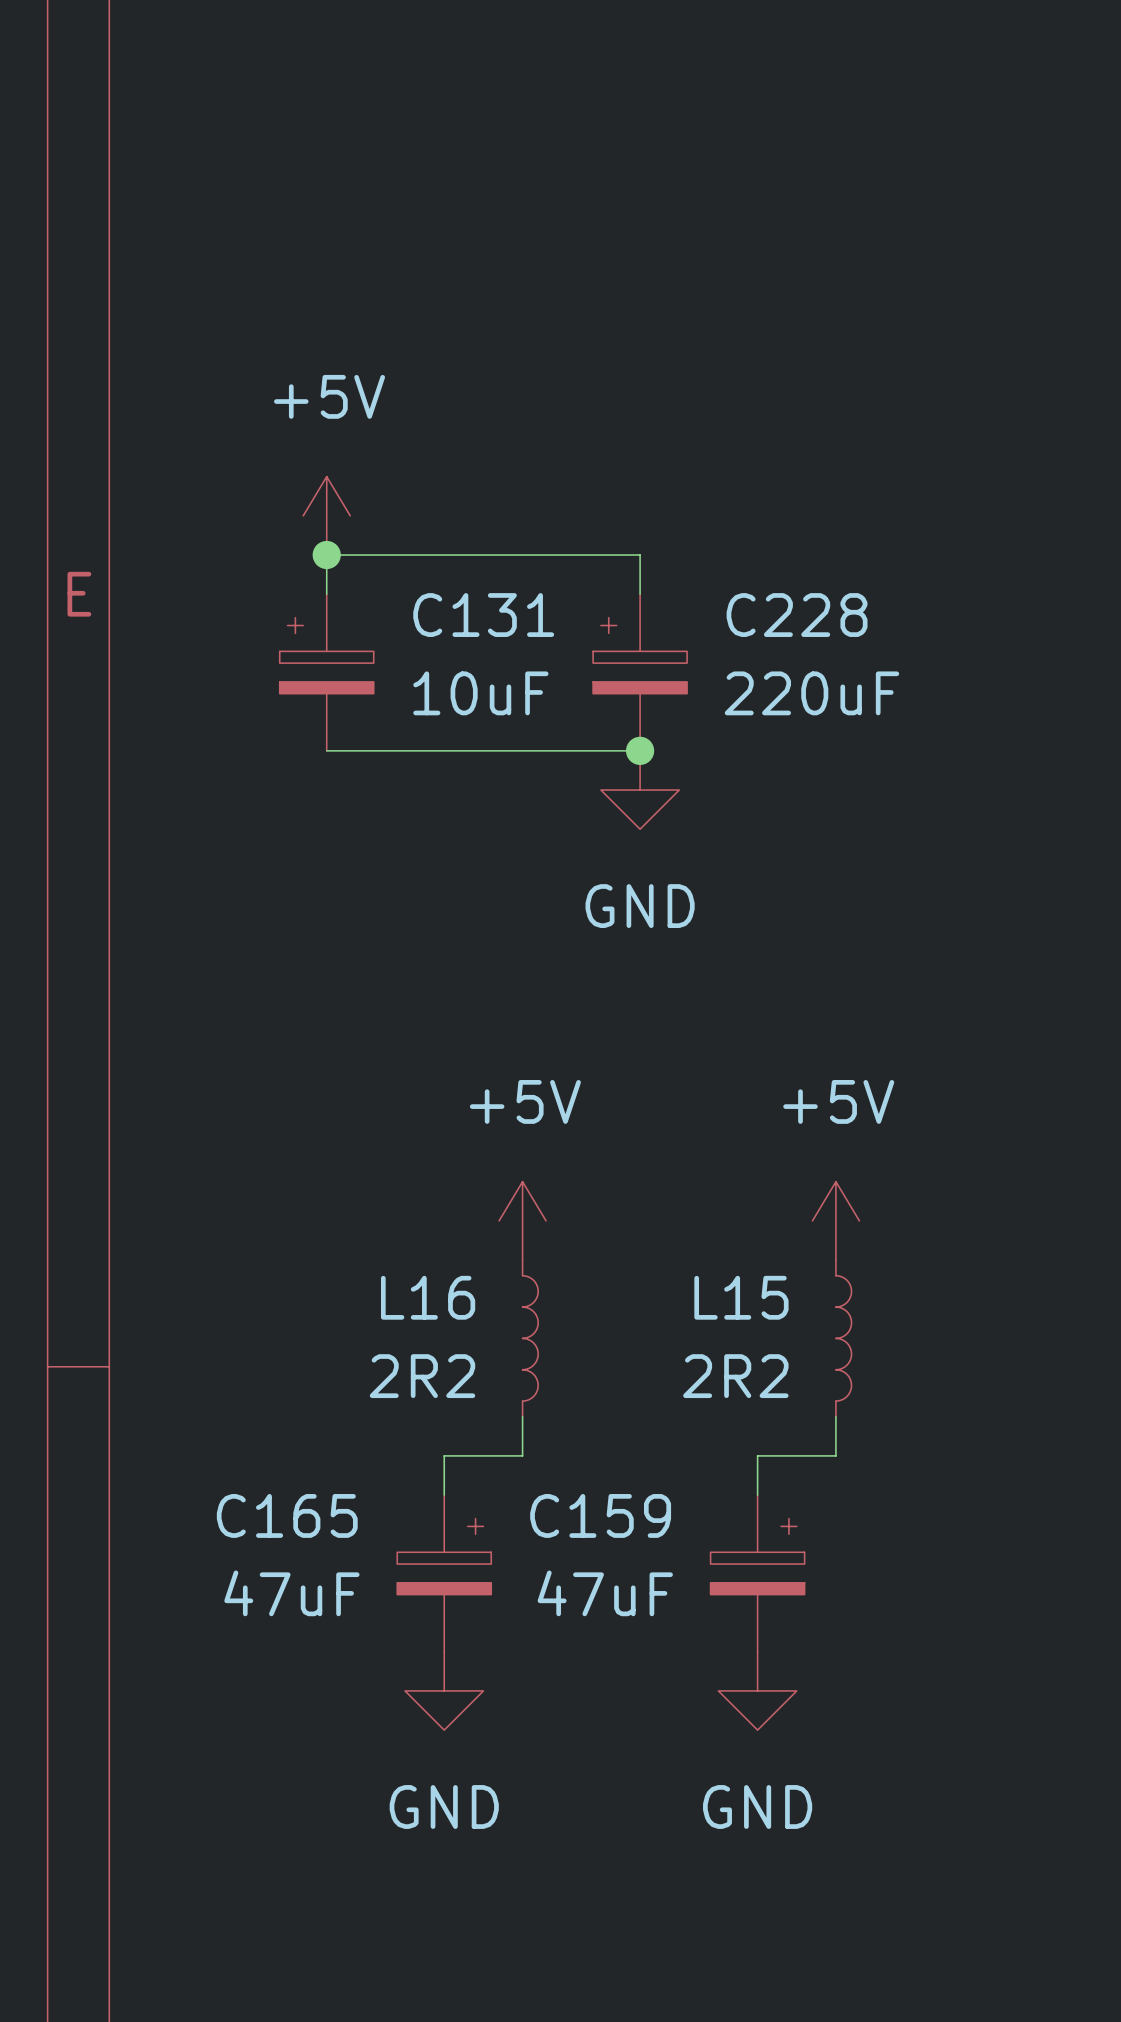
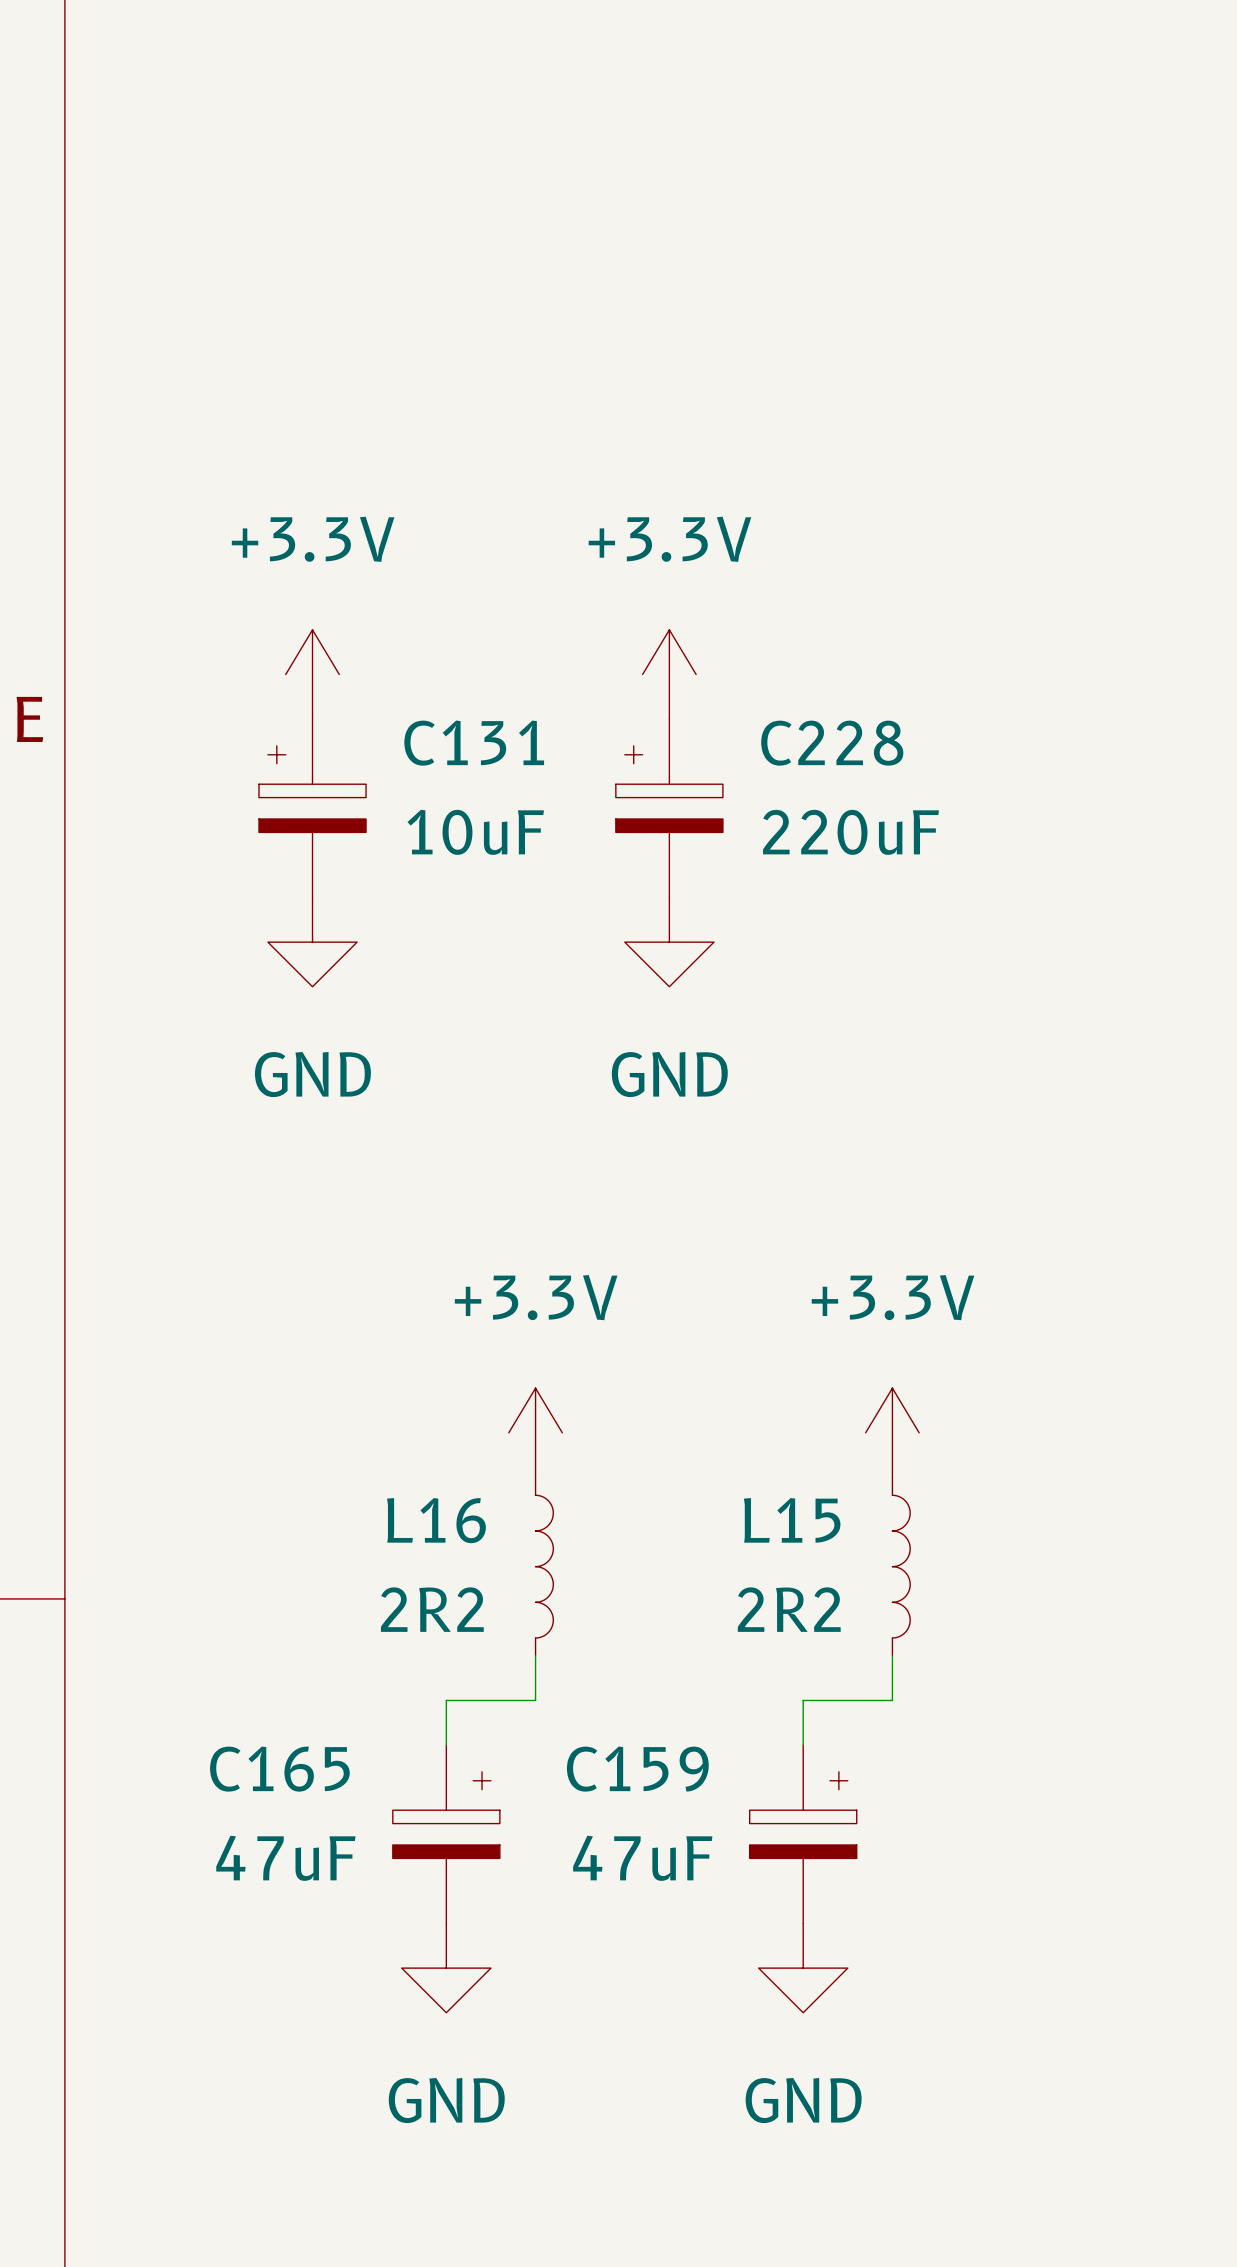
power symbol: +5V (326, 515) -> none
junction: (326, 555) -> none
power symbol: none -> +3.3V (312, 674)
power symbol: none -> +3.3V (669, 674)
wire: (326, 594) (326, 555) (640, 555) (640, 594) -> none
wire: (326, 750) (640, 750) -> none
junction: (640, 750) -> none
power symbol: none -> GND (312, 942)
power symbol: +5V (522, 1220) -> +3.3V (535, 1432)
power symbol: +5V (835, 1220) -> +3.3V (892, 1432)

